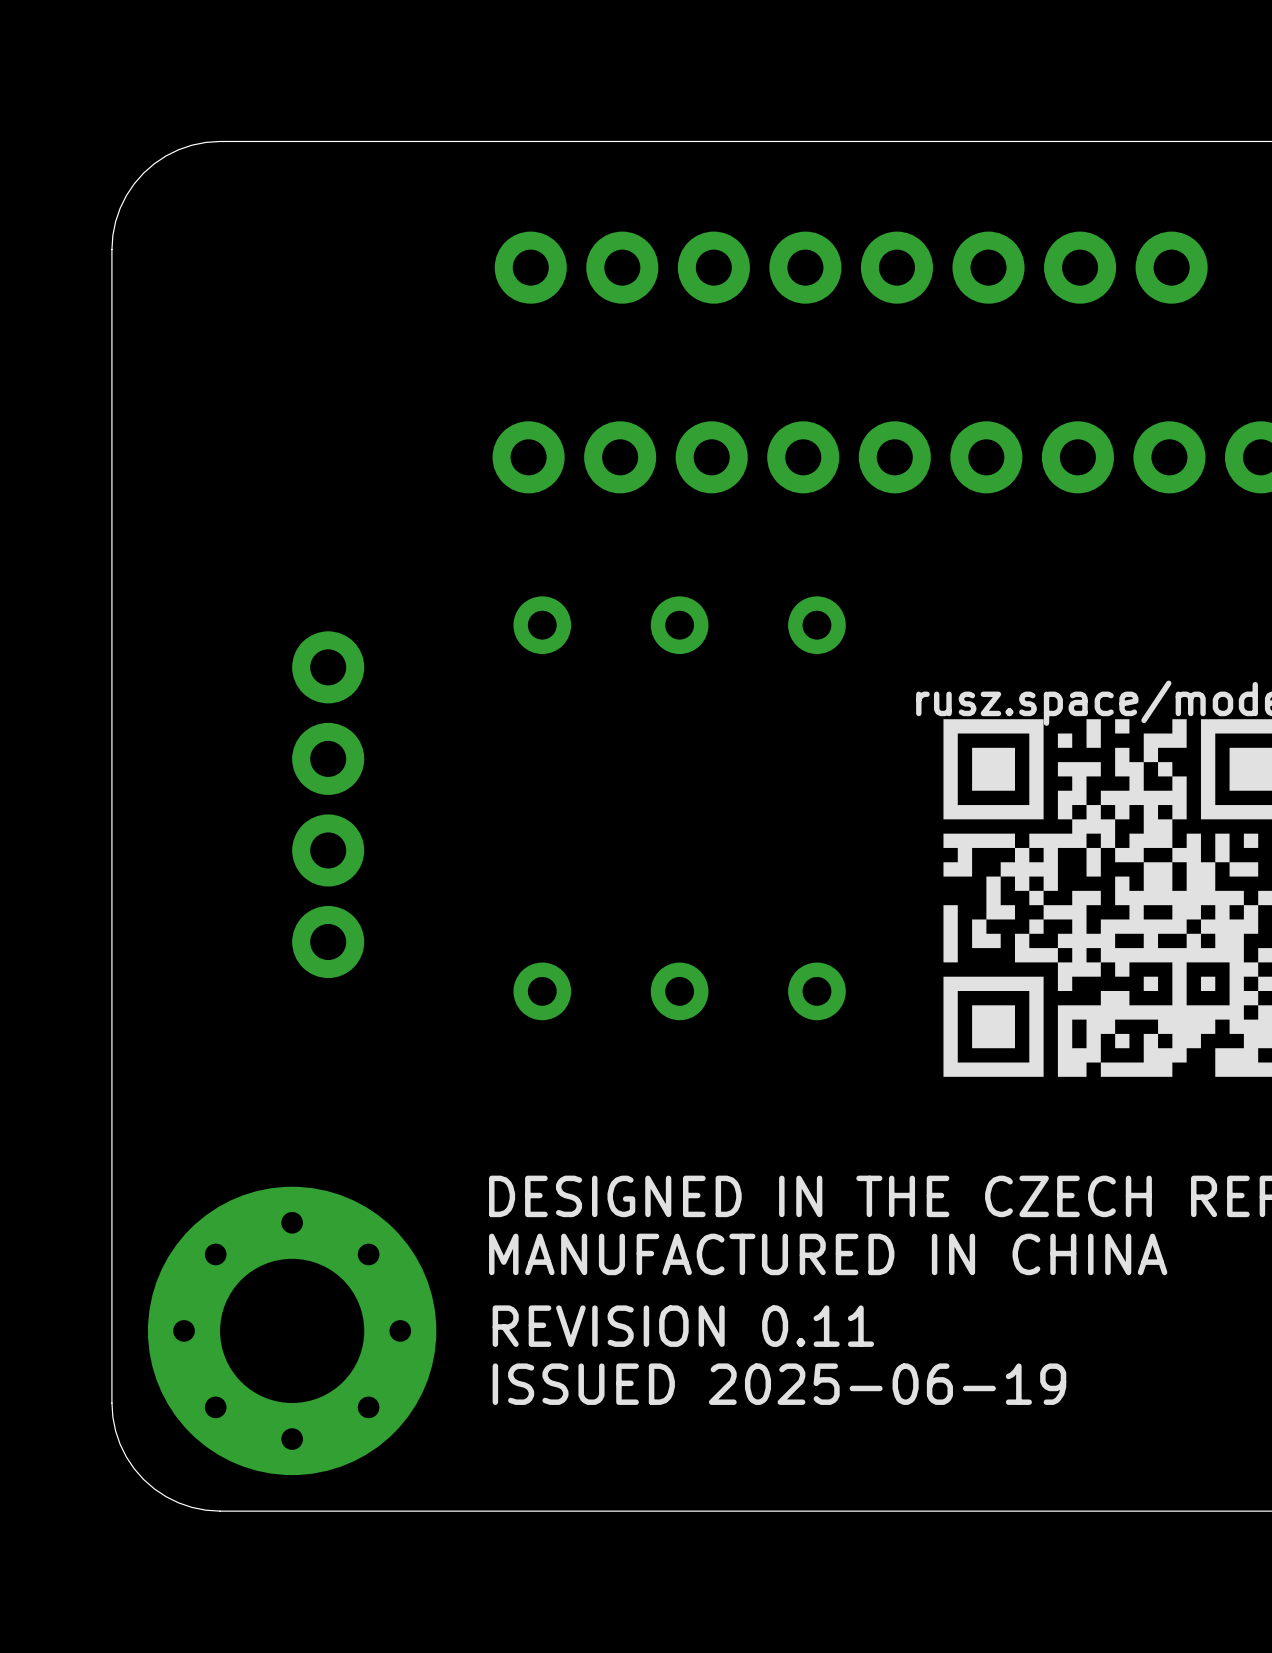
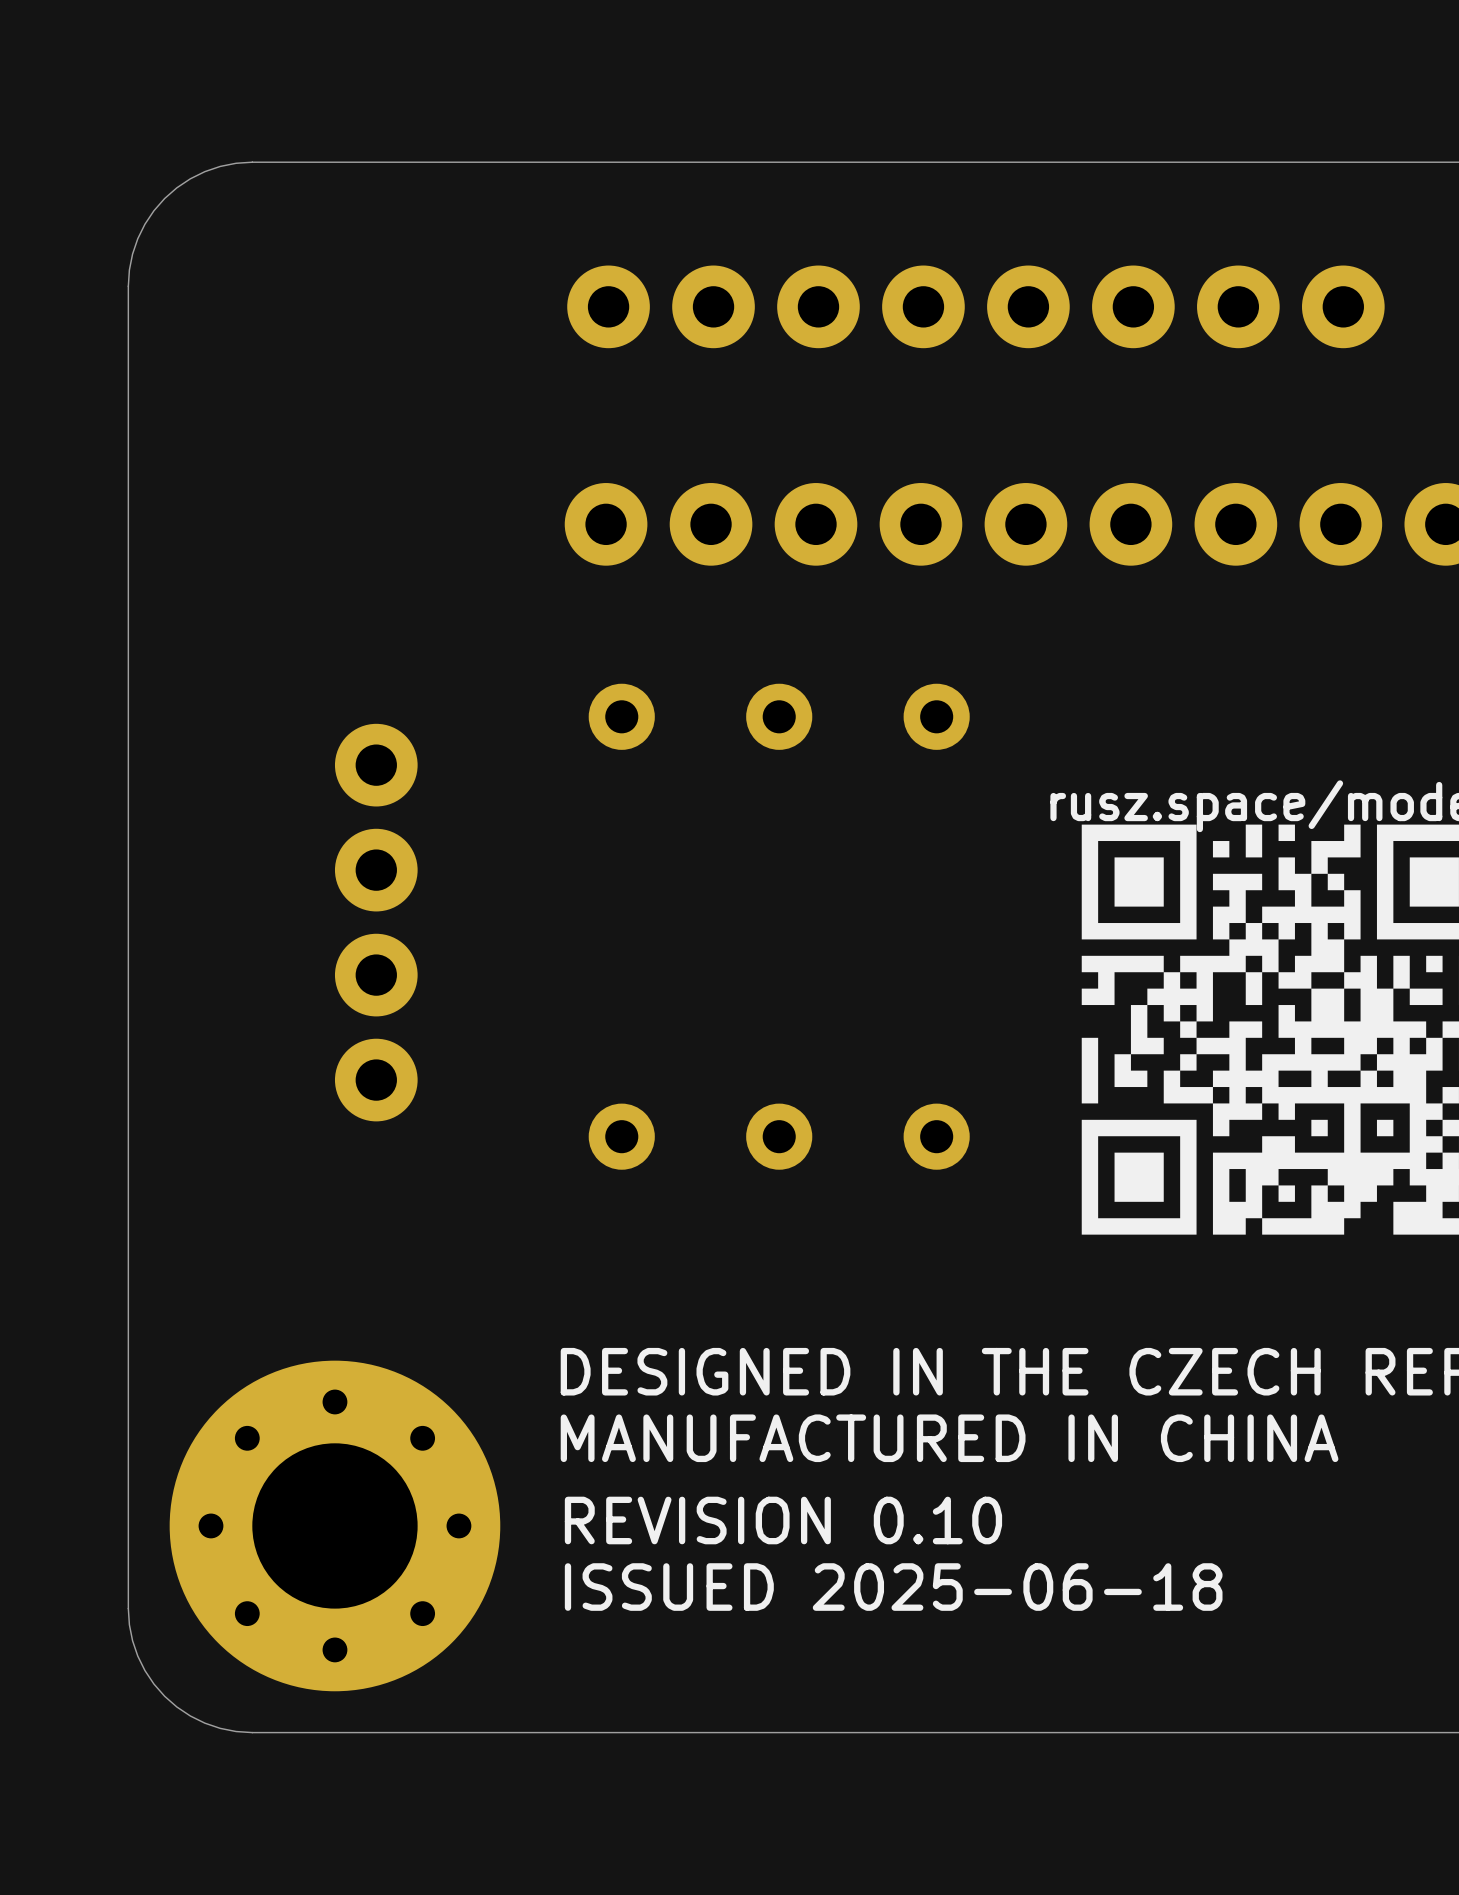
text: REVISION 0.11 (683, 1326) -> REVISION 0.10 (783, 1520)
text: ISSUED 2025-06-19 (779, 1384) -> ISSUED 2025-06-18 (893, 1587)

